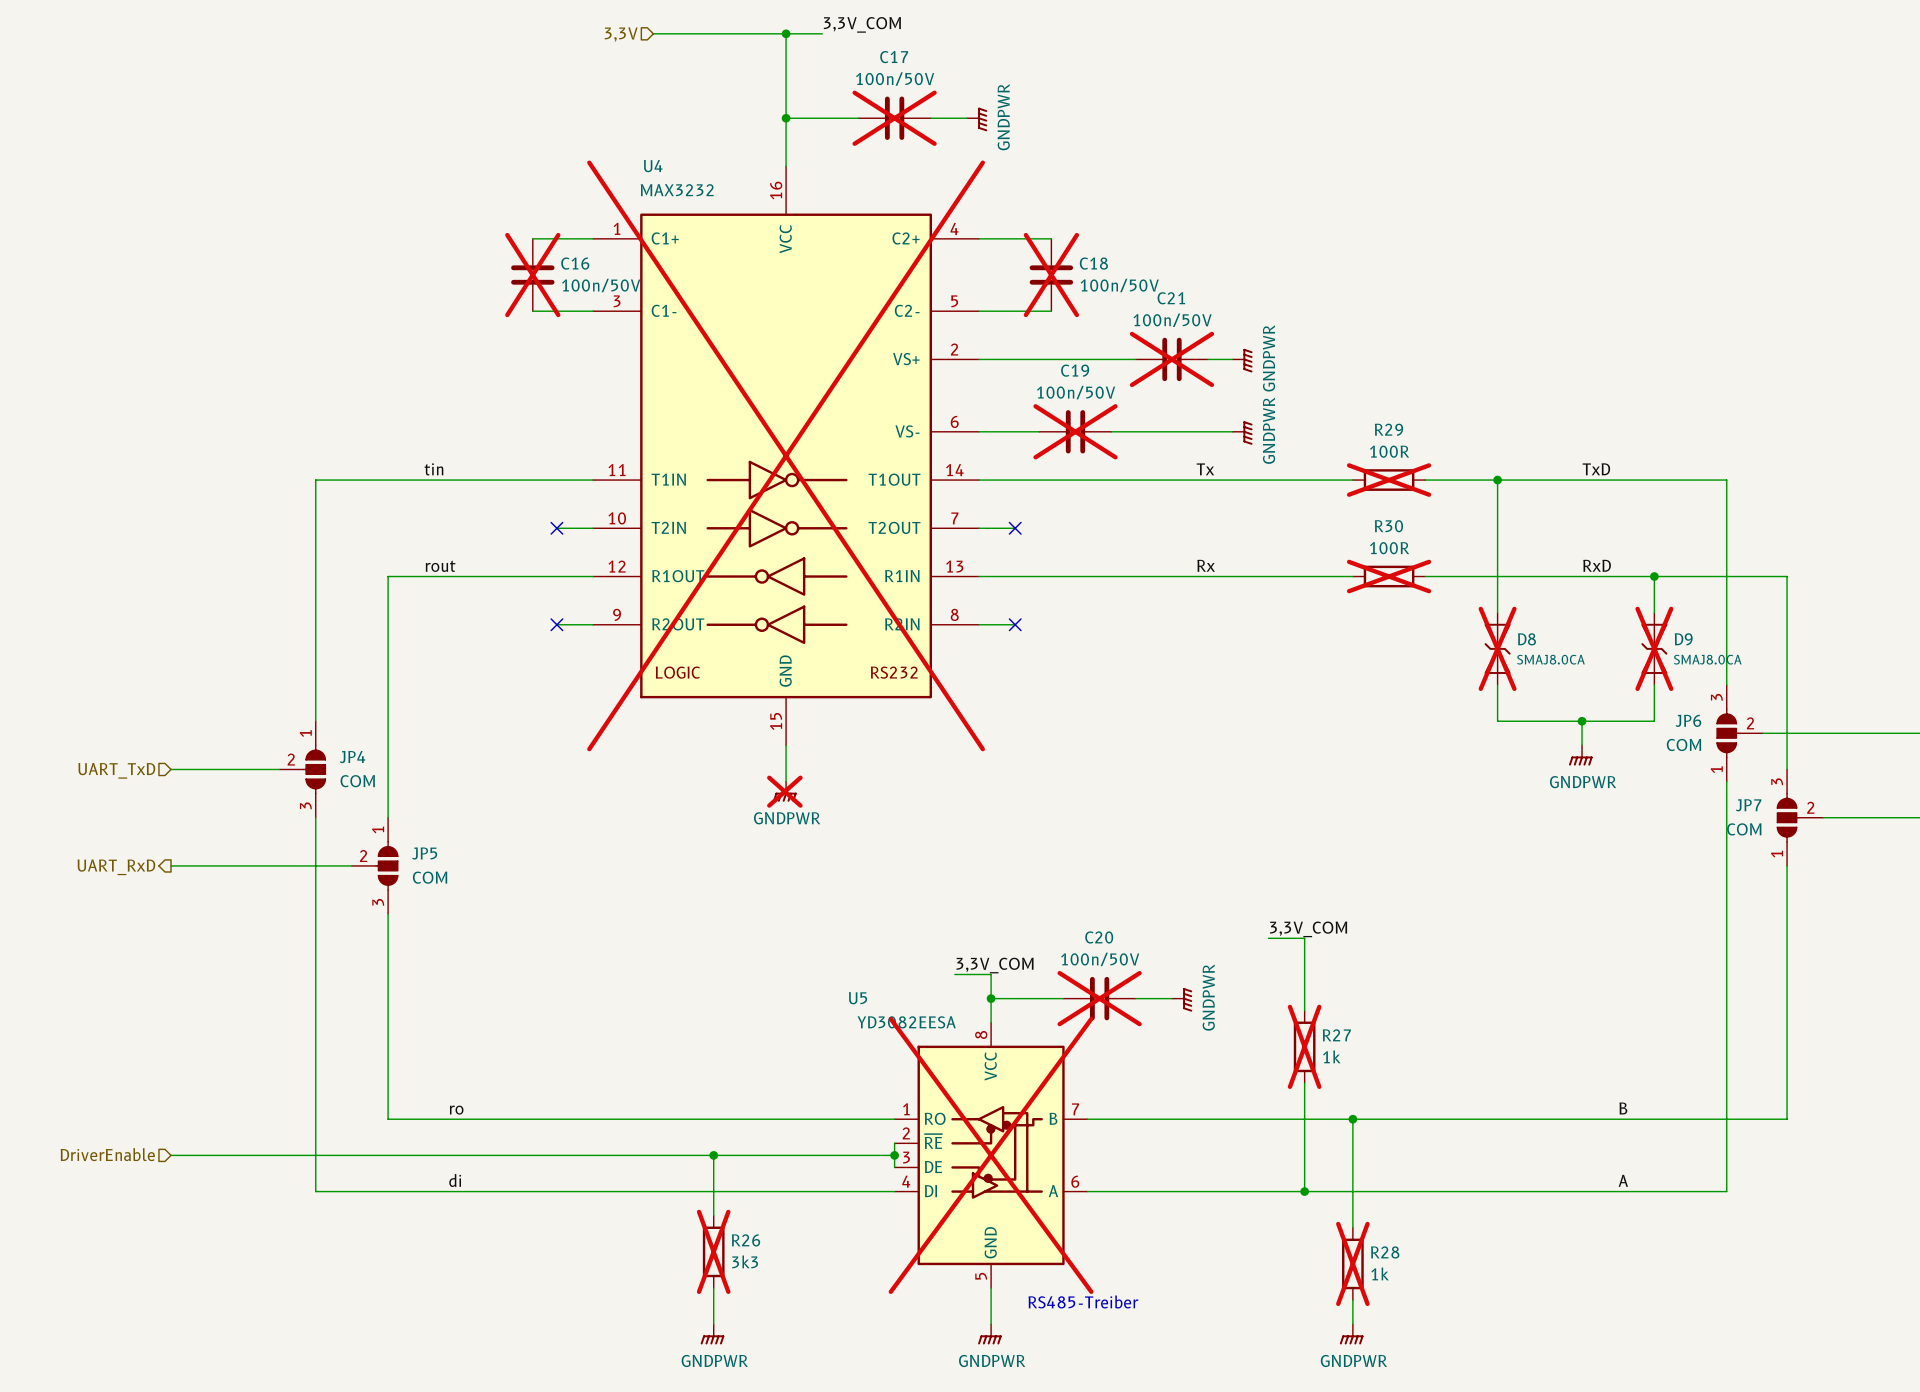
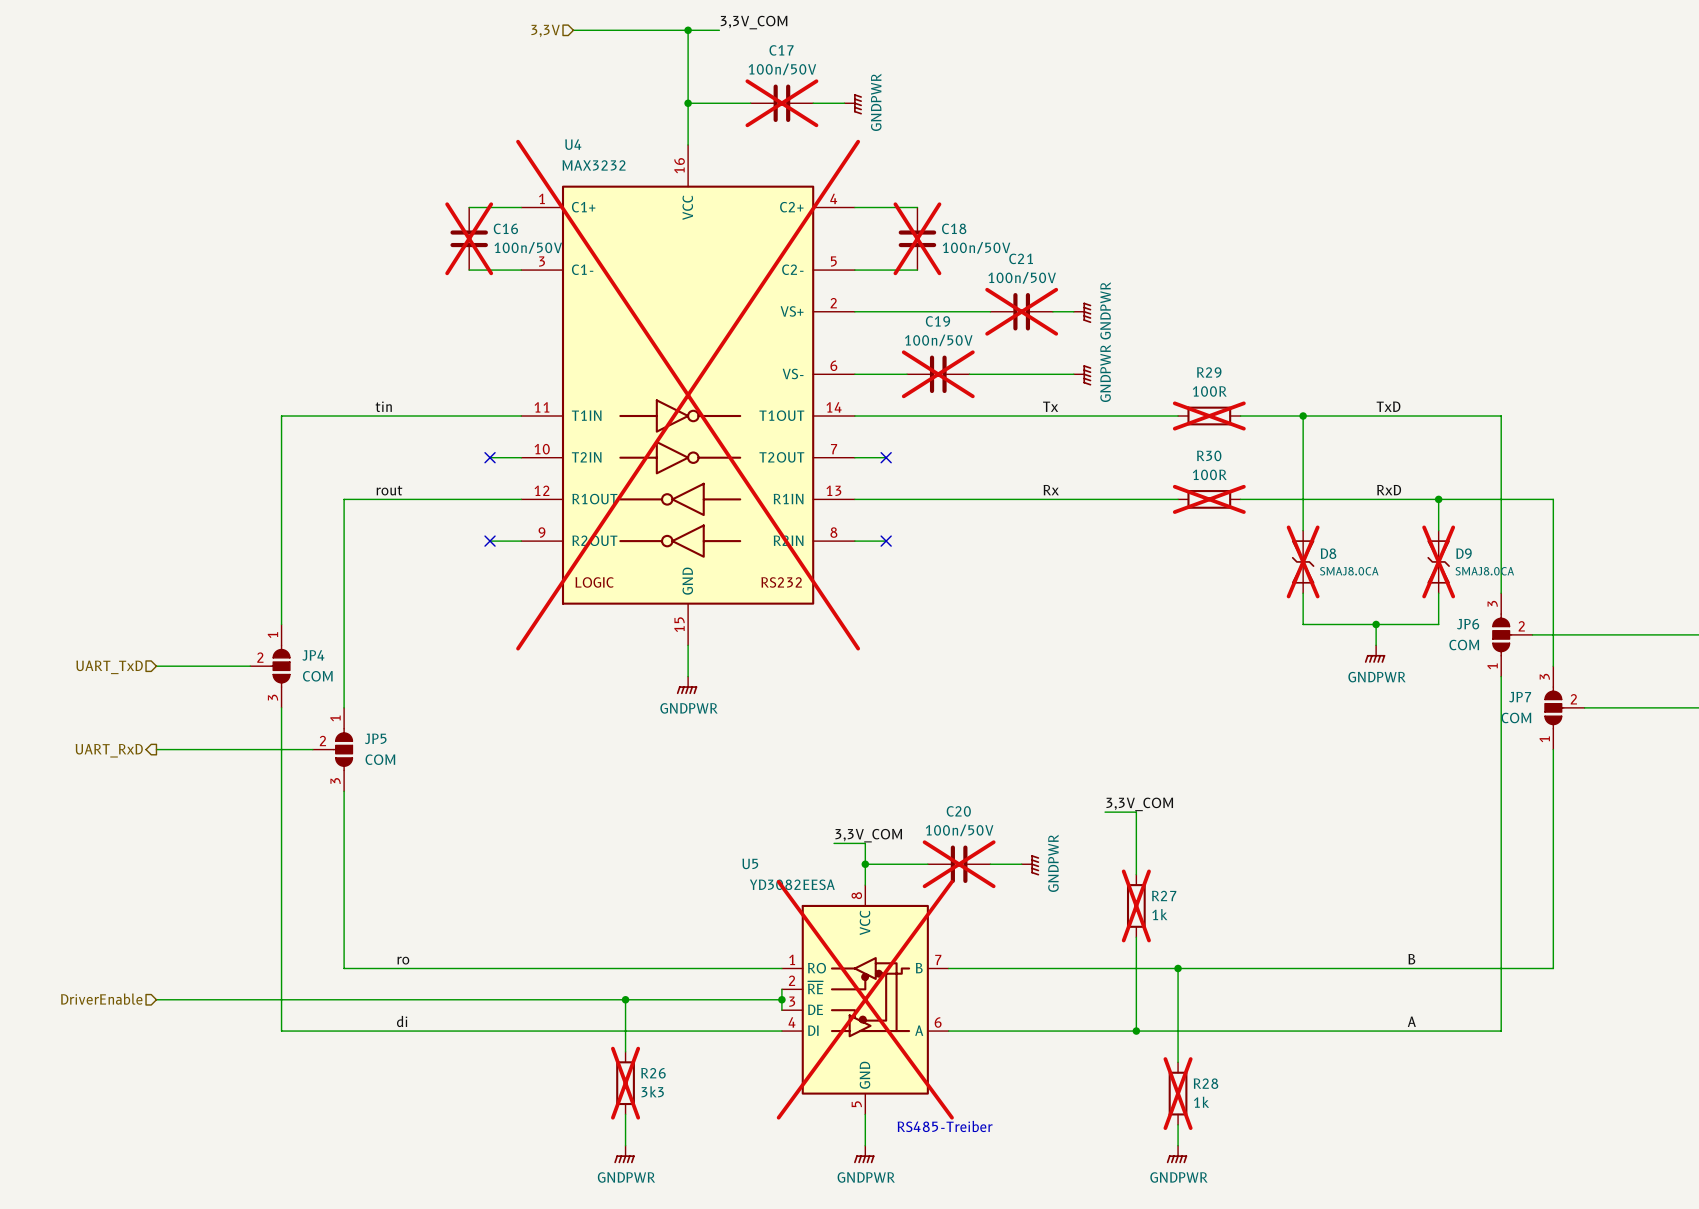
power symbol do-not-place cross: (784, 791) -> none

